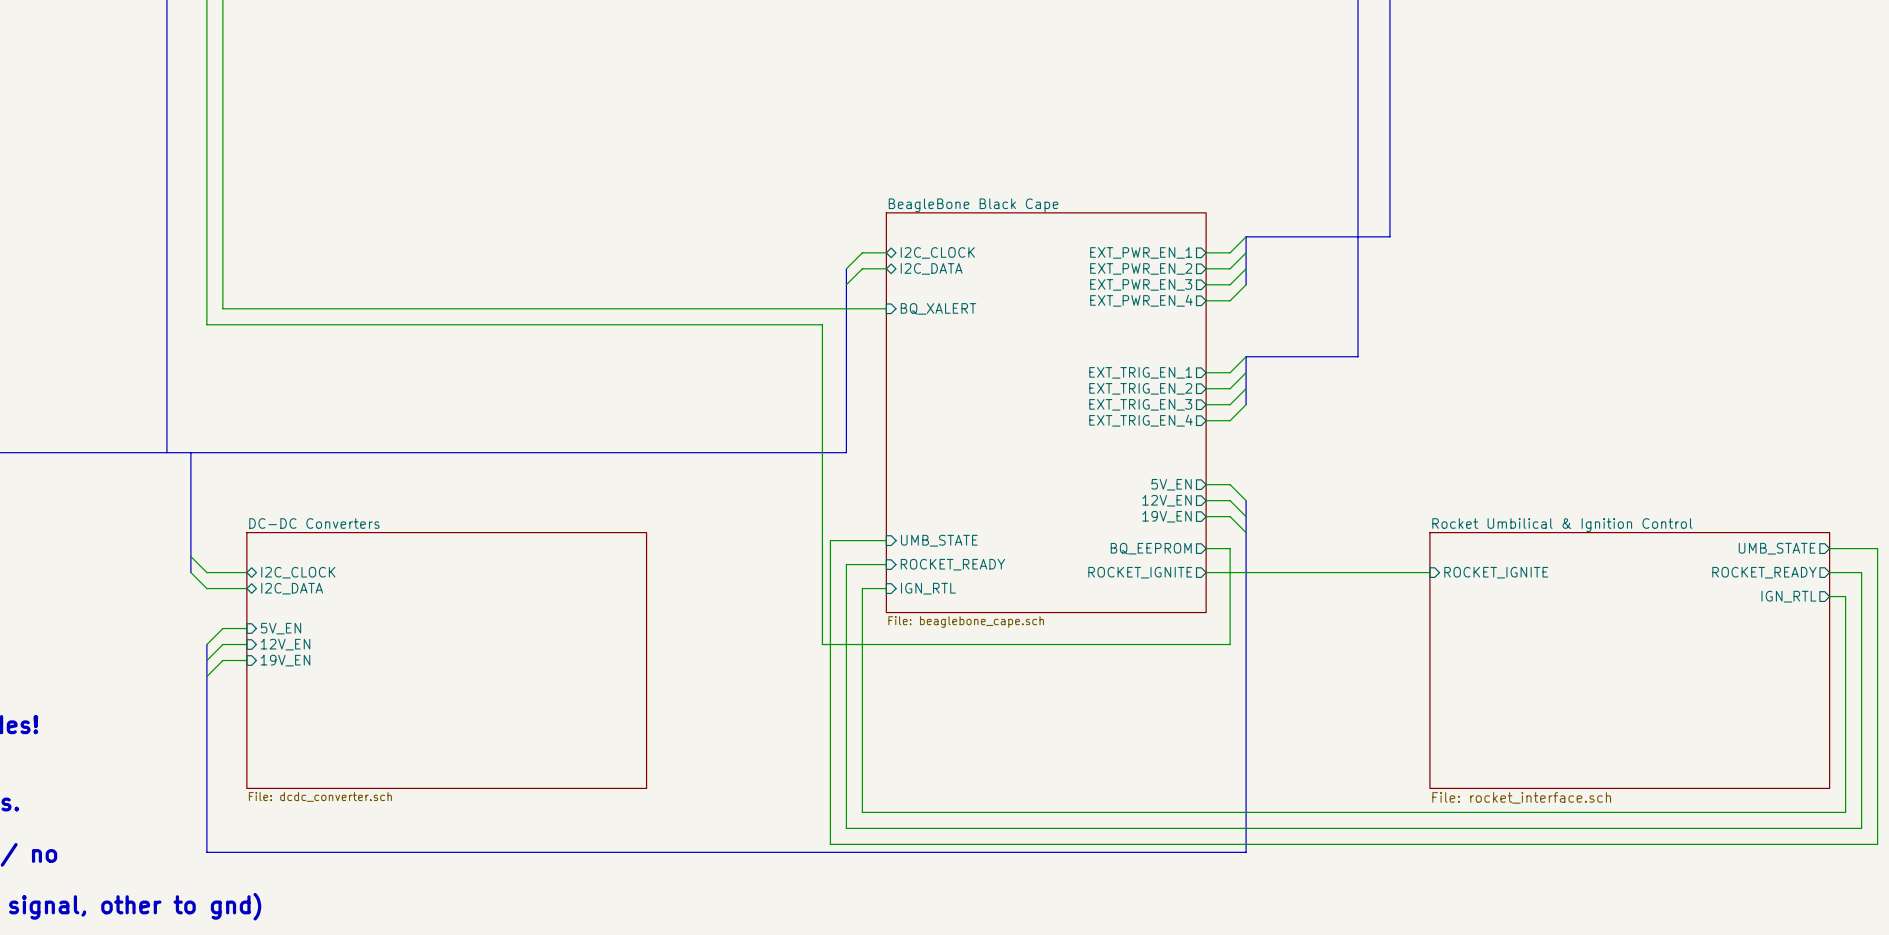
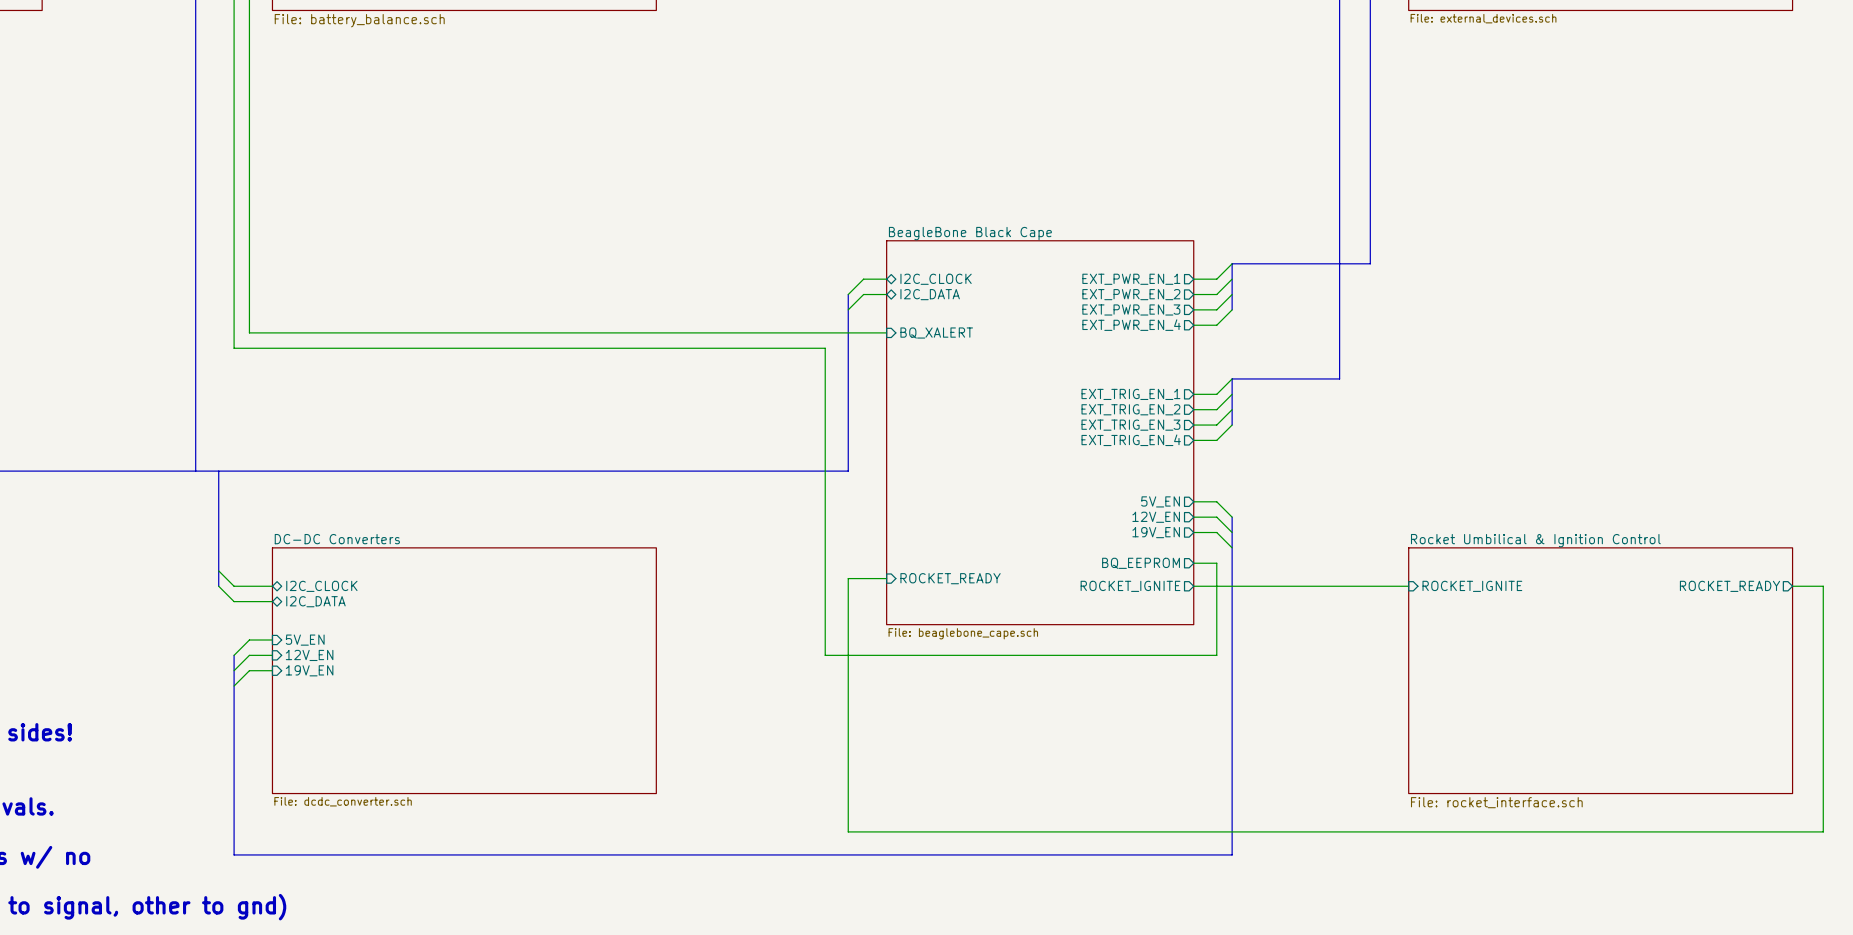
wire: (886, 540) (830, 540) (830, 844) (1877, 844) (1877, 548) (1829, 548) -> none
sheet pin: UMB_STATE (939, 540) -> none
sheet pin: UMB_STATE (1777, 548) -> none
wire: (886, 588) (862, 588) (862, 812) (1845, 812) (1845, 596) (1829, 596) -> none
sheet pin: IGN_RTL (928, 588) -> none
sheet pin: IGN_RTL (1788, 596) -> none

